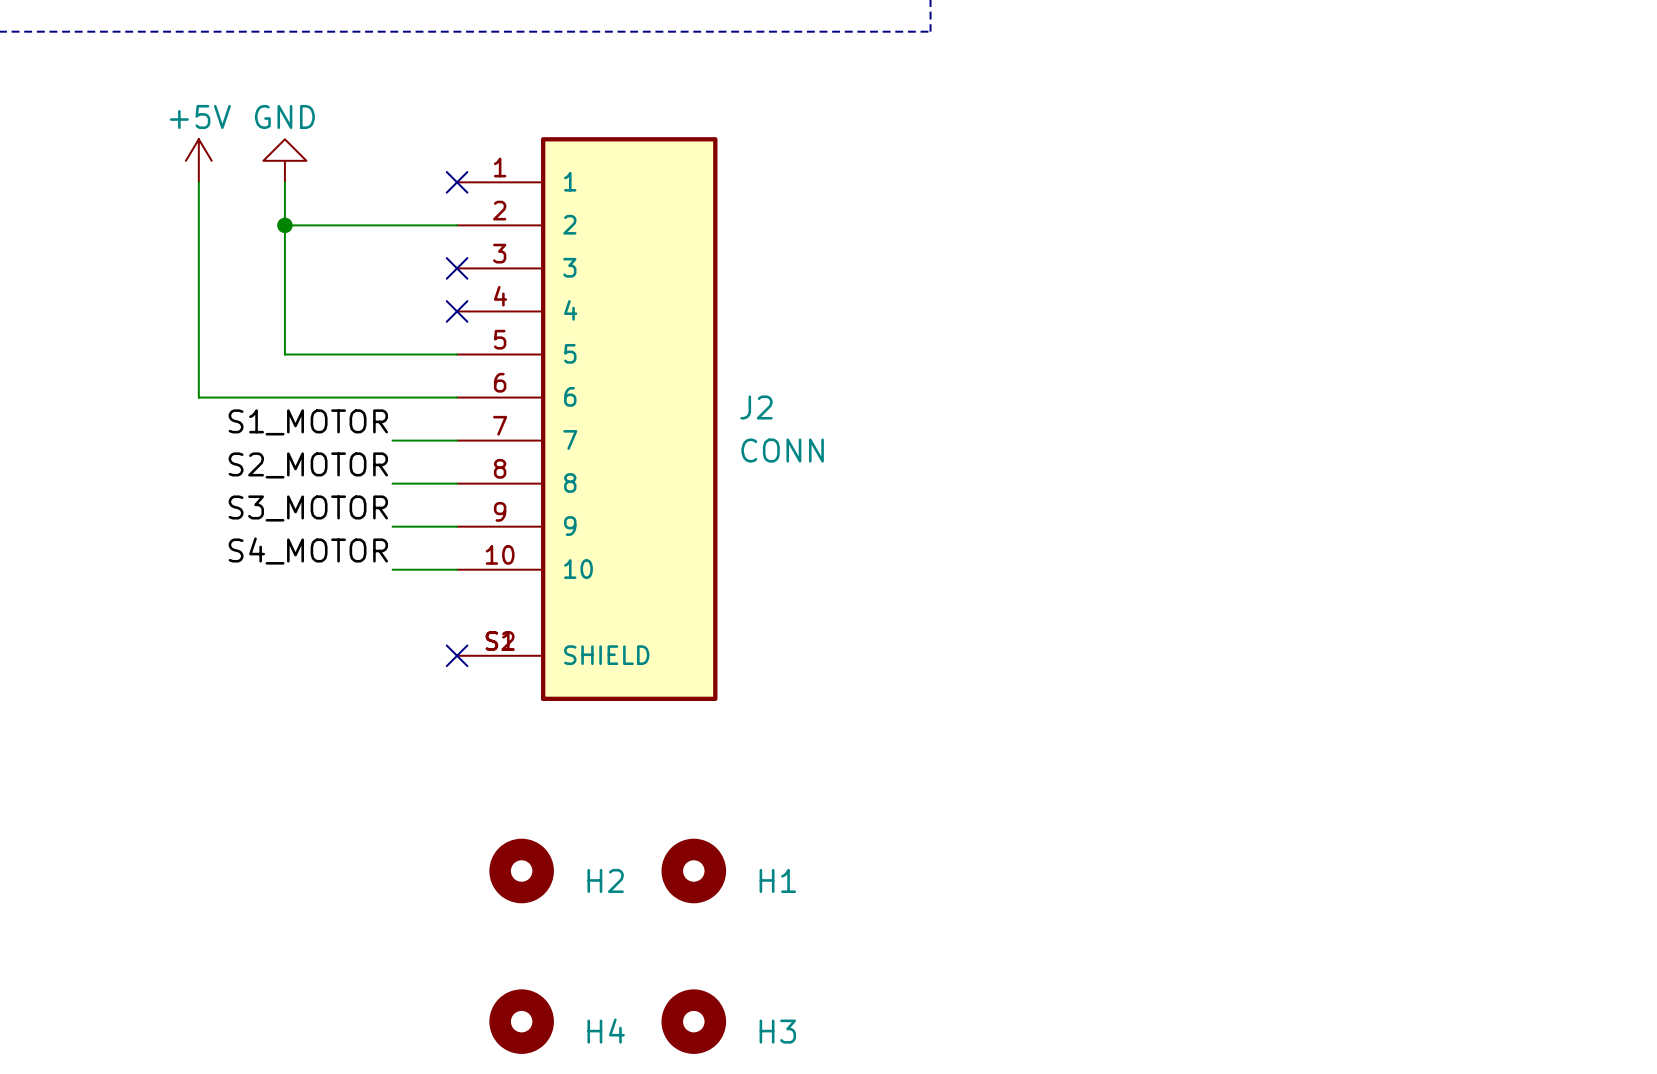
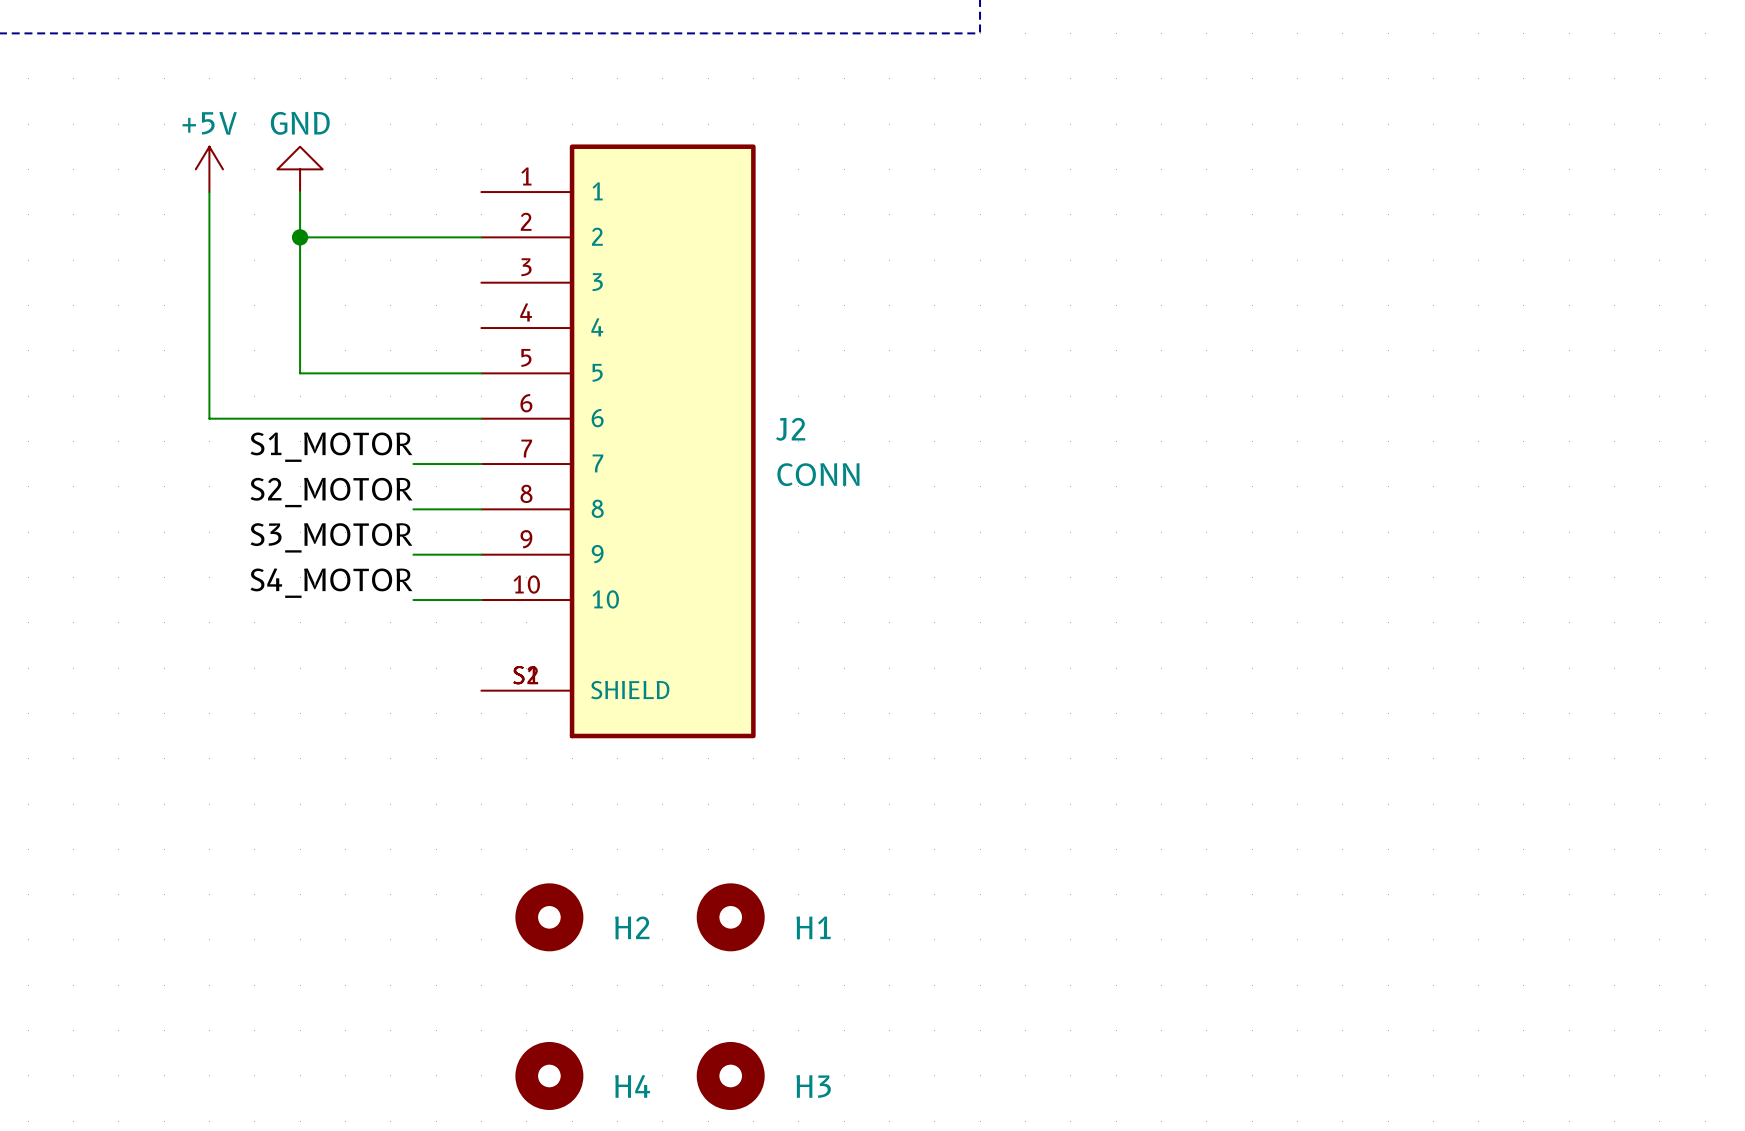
no-connect mark: (457, 182) -> none
no-connect mark: (457, 268) -> none
no-connect mark: (457, 311) -> none
no-connect mark: (457, 655) -> none

